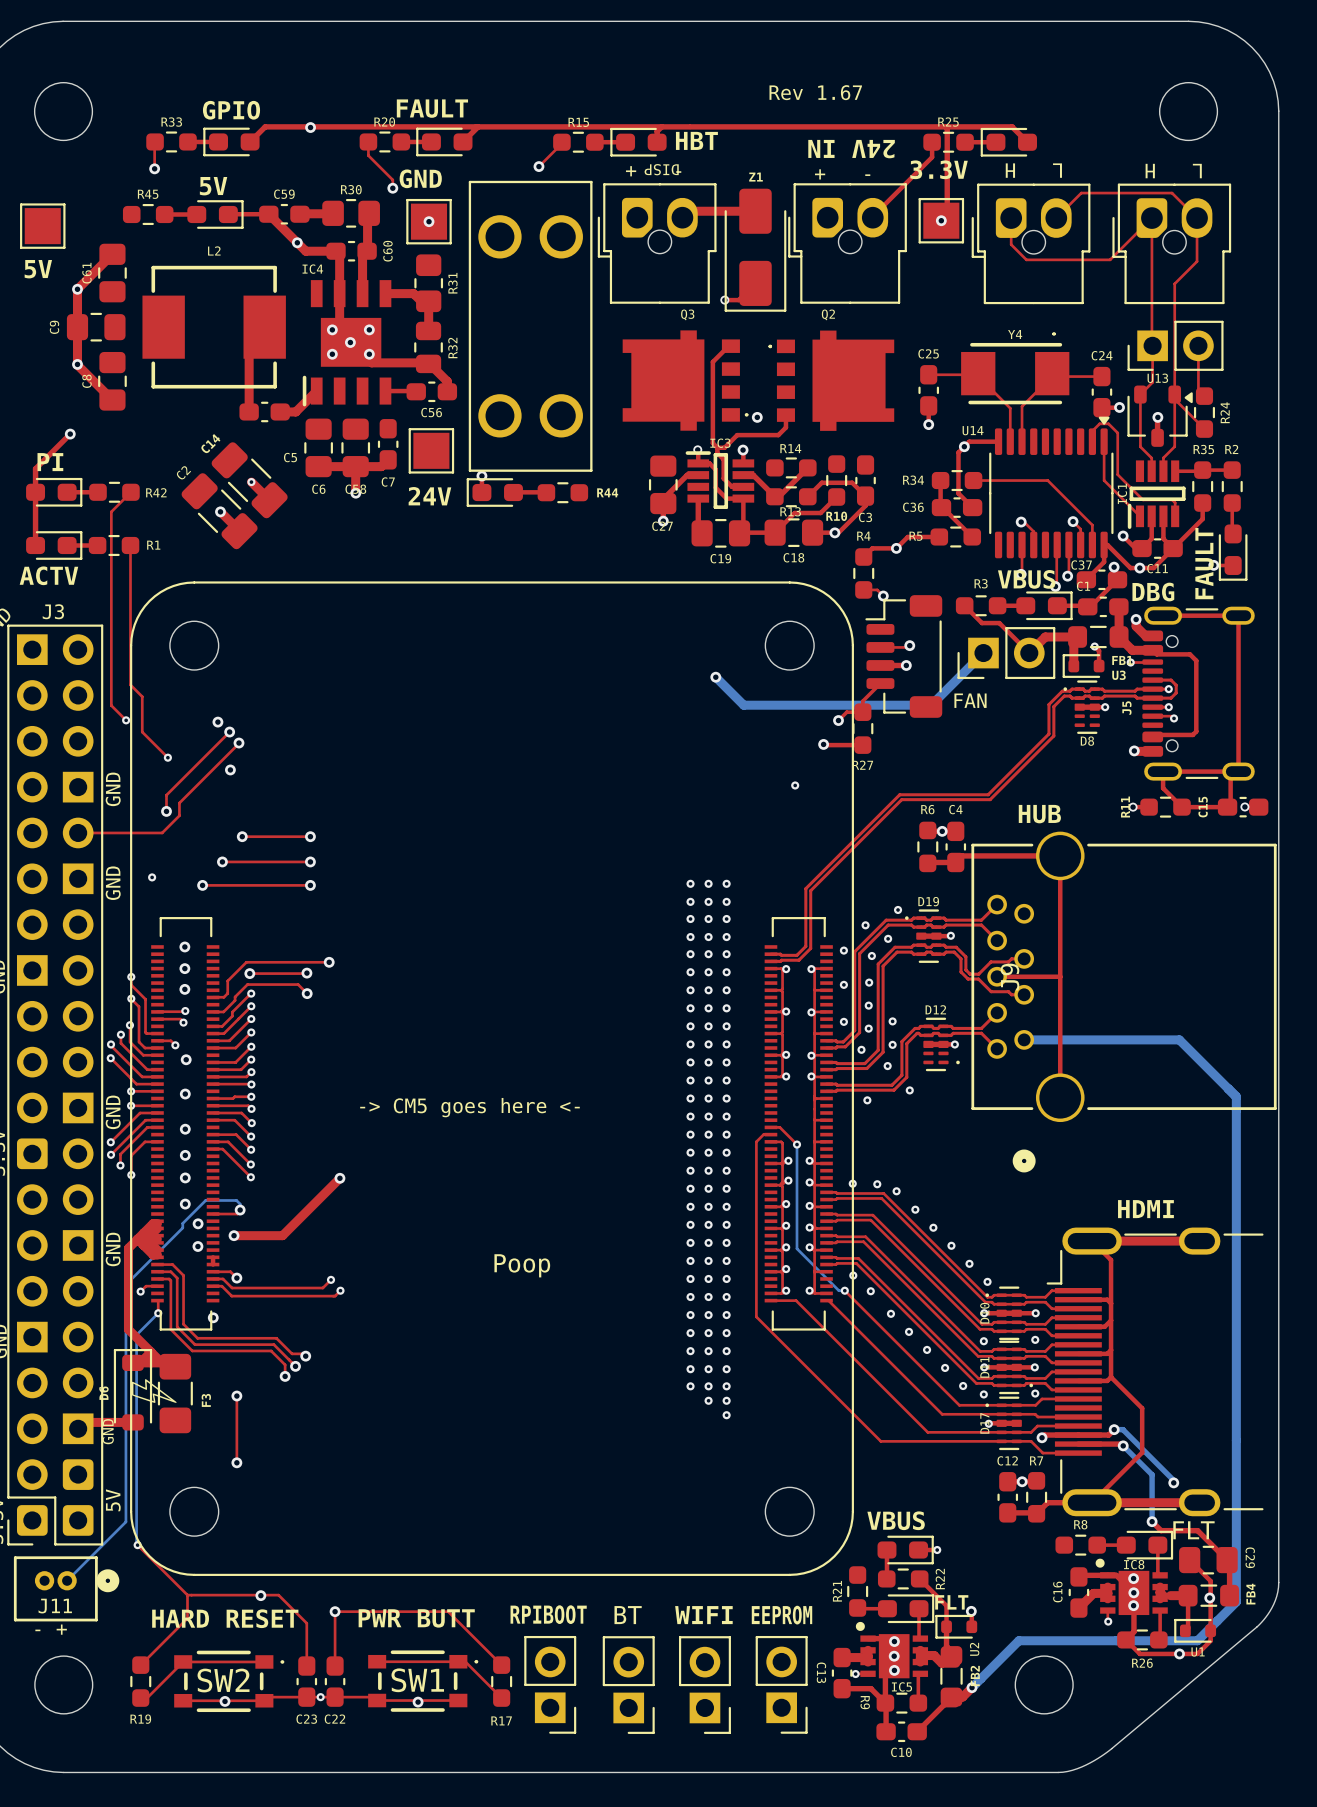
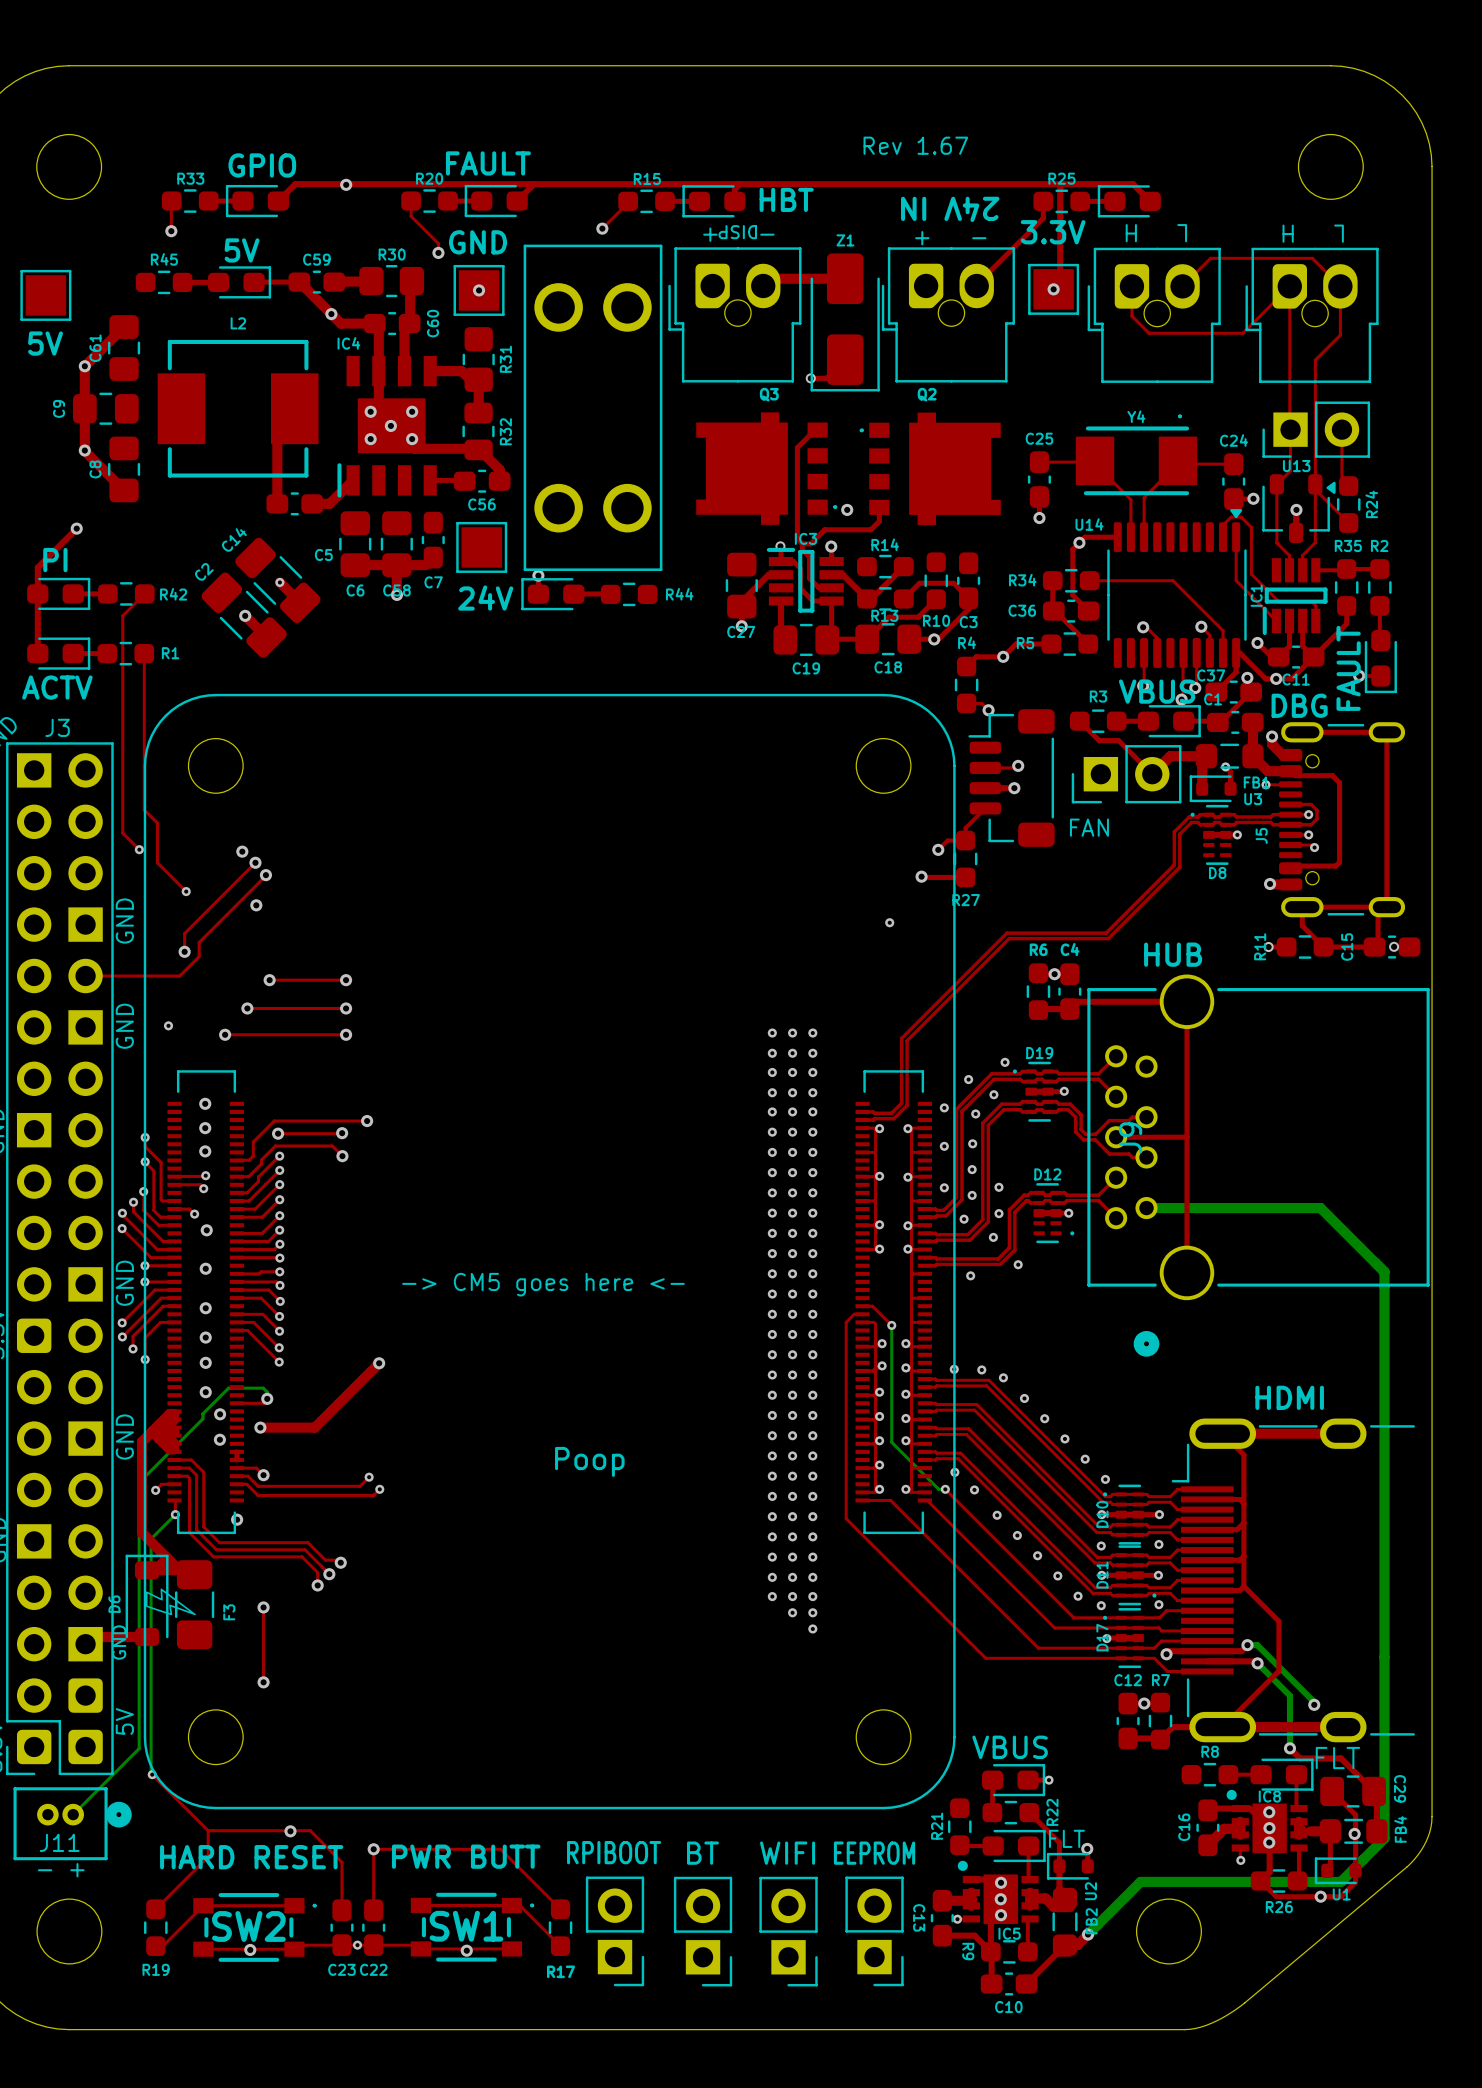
bottom track: (983, 653) (931, 705) (743, 705) (715, 677) -> none
via: (715, 677) -> none

